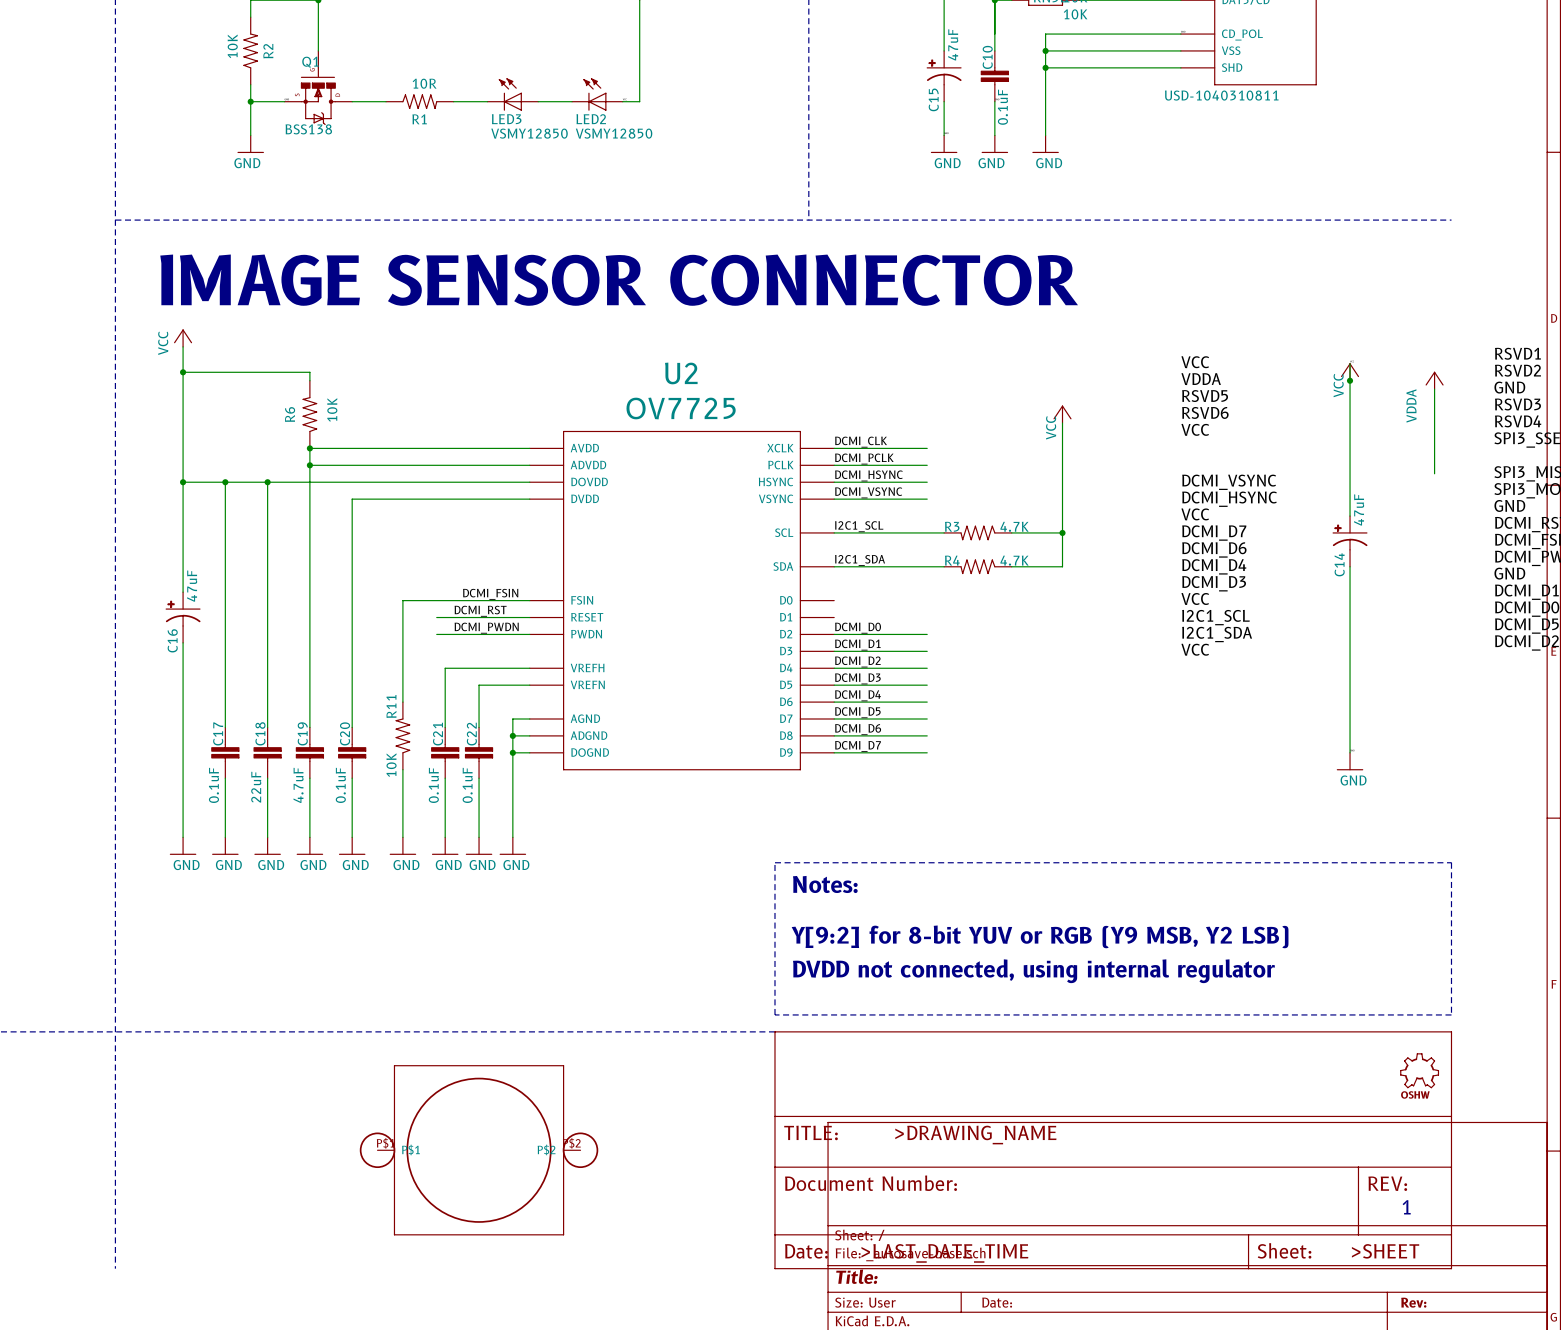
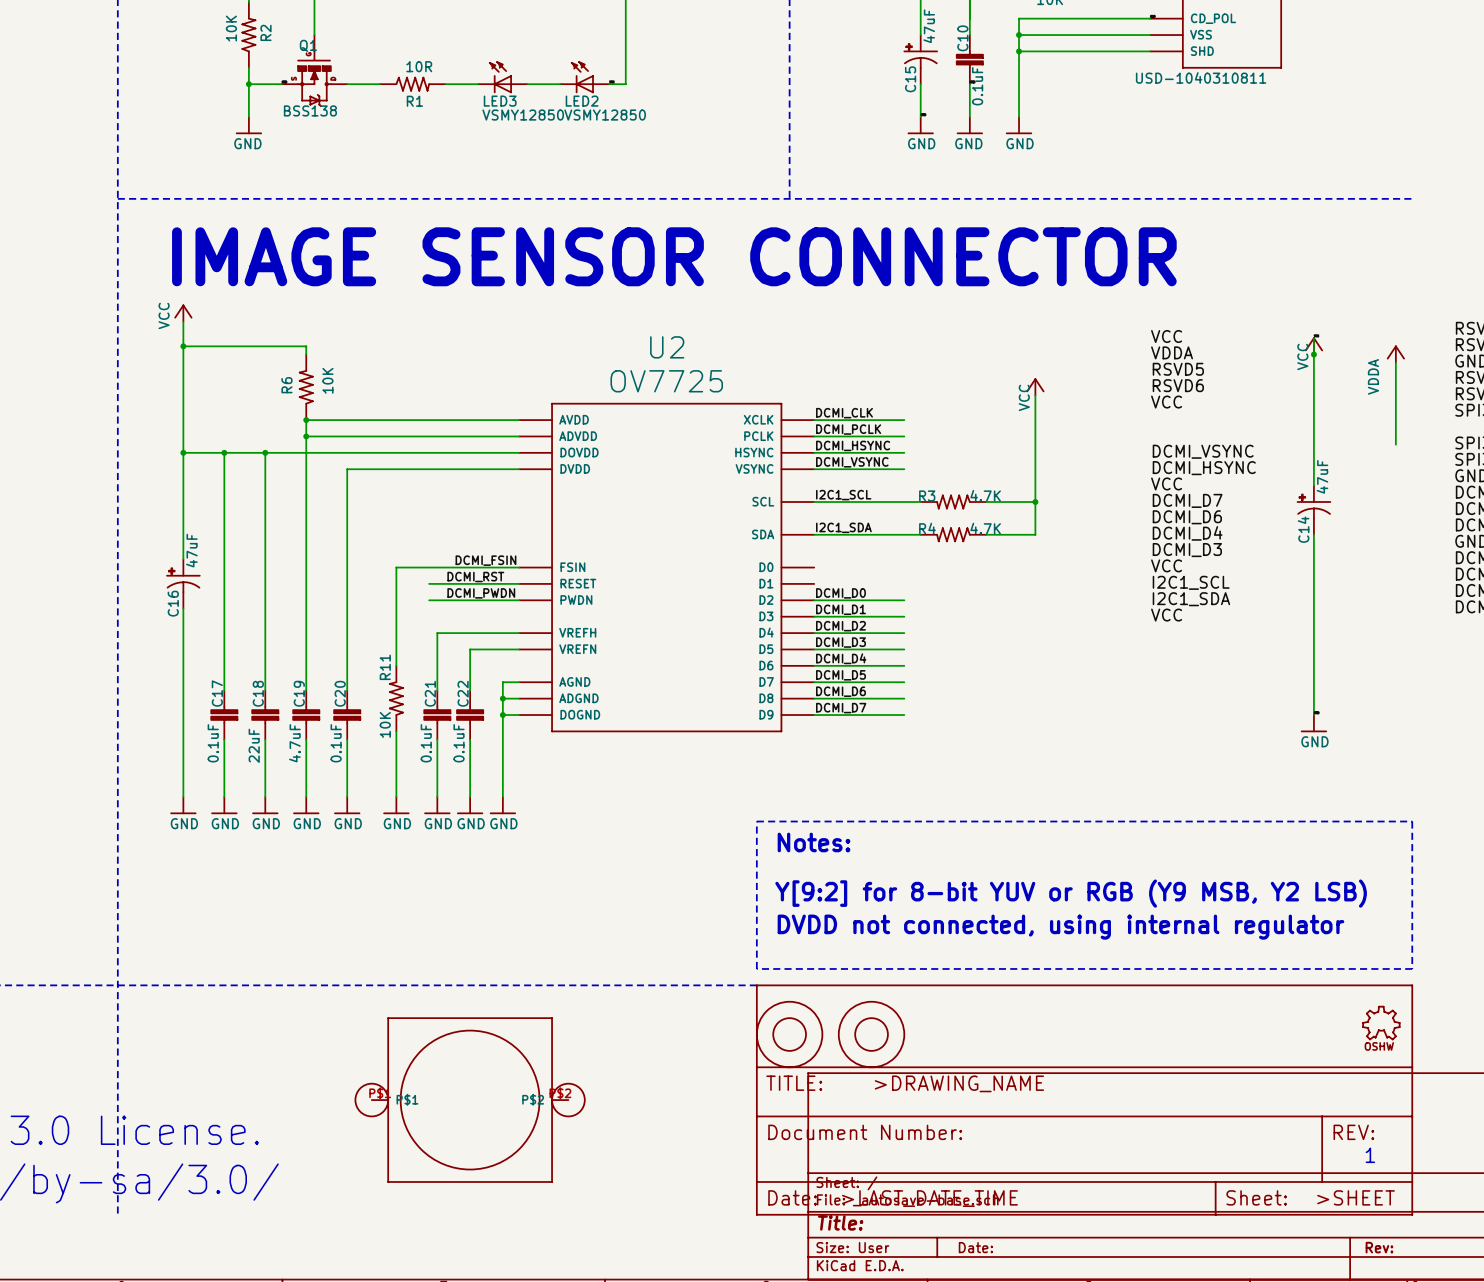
part: none -> (789, 1034)
part: none -> (871, 1034)

